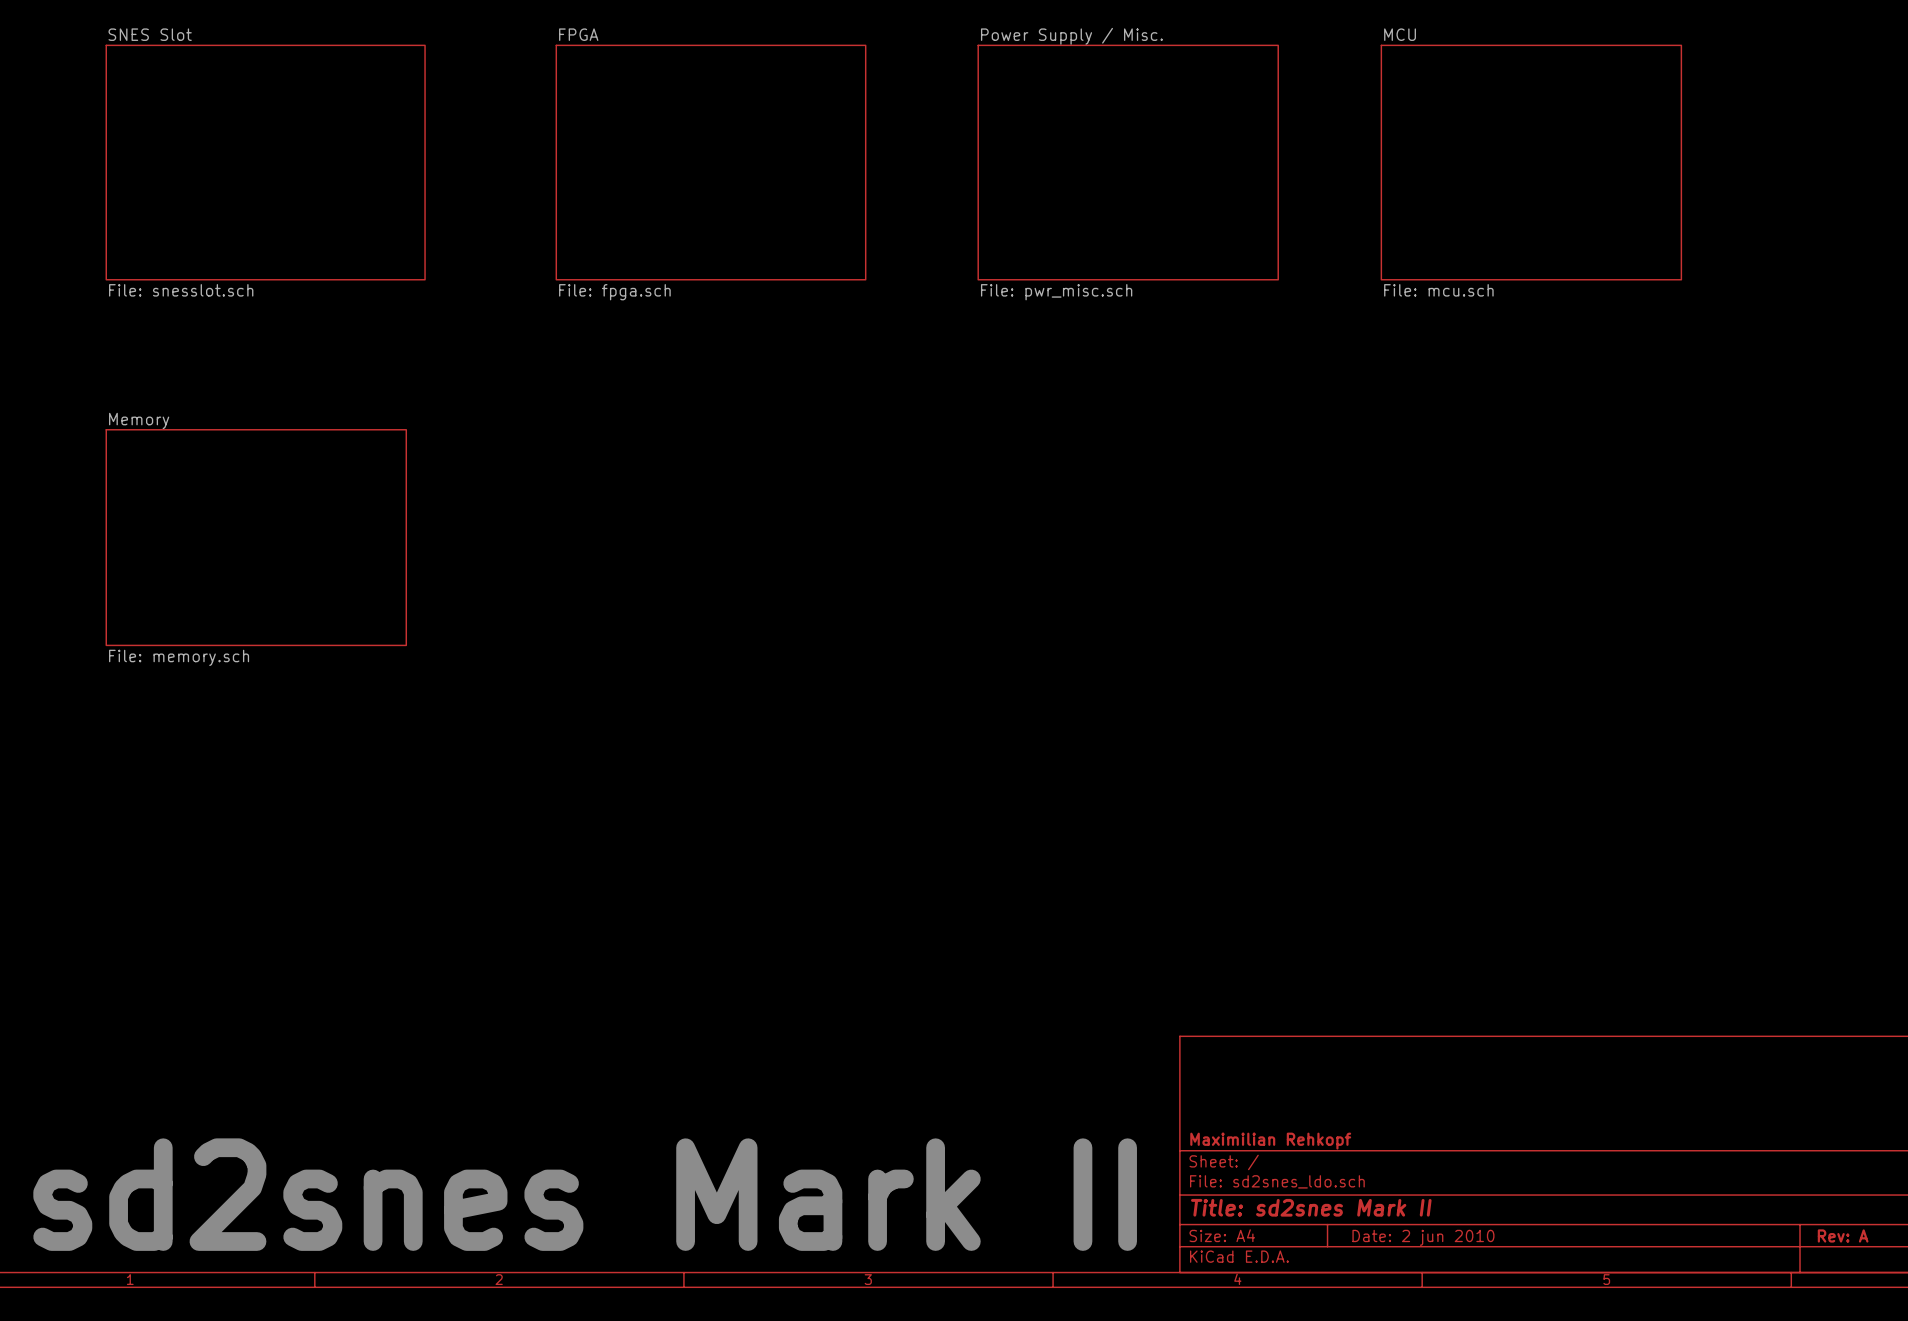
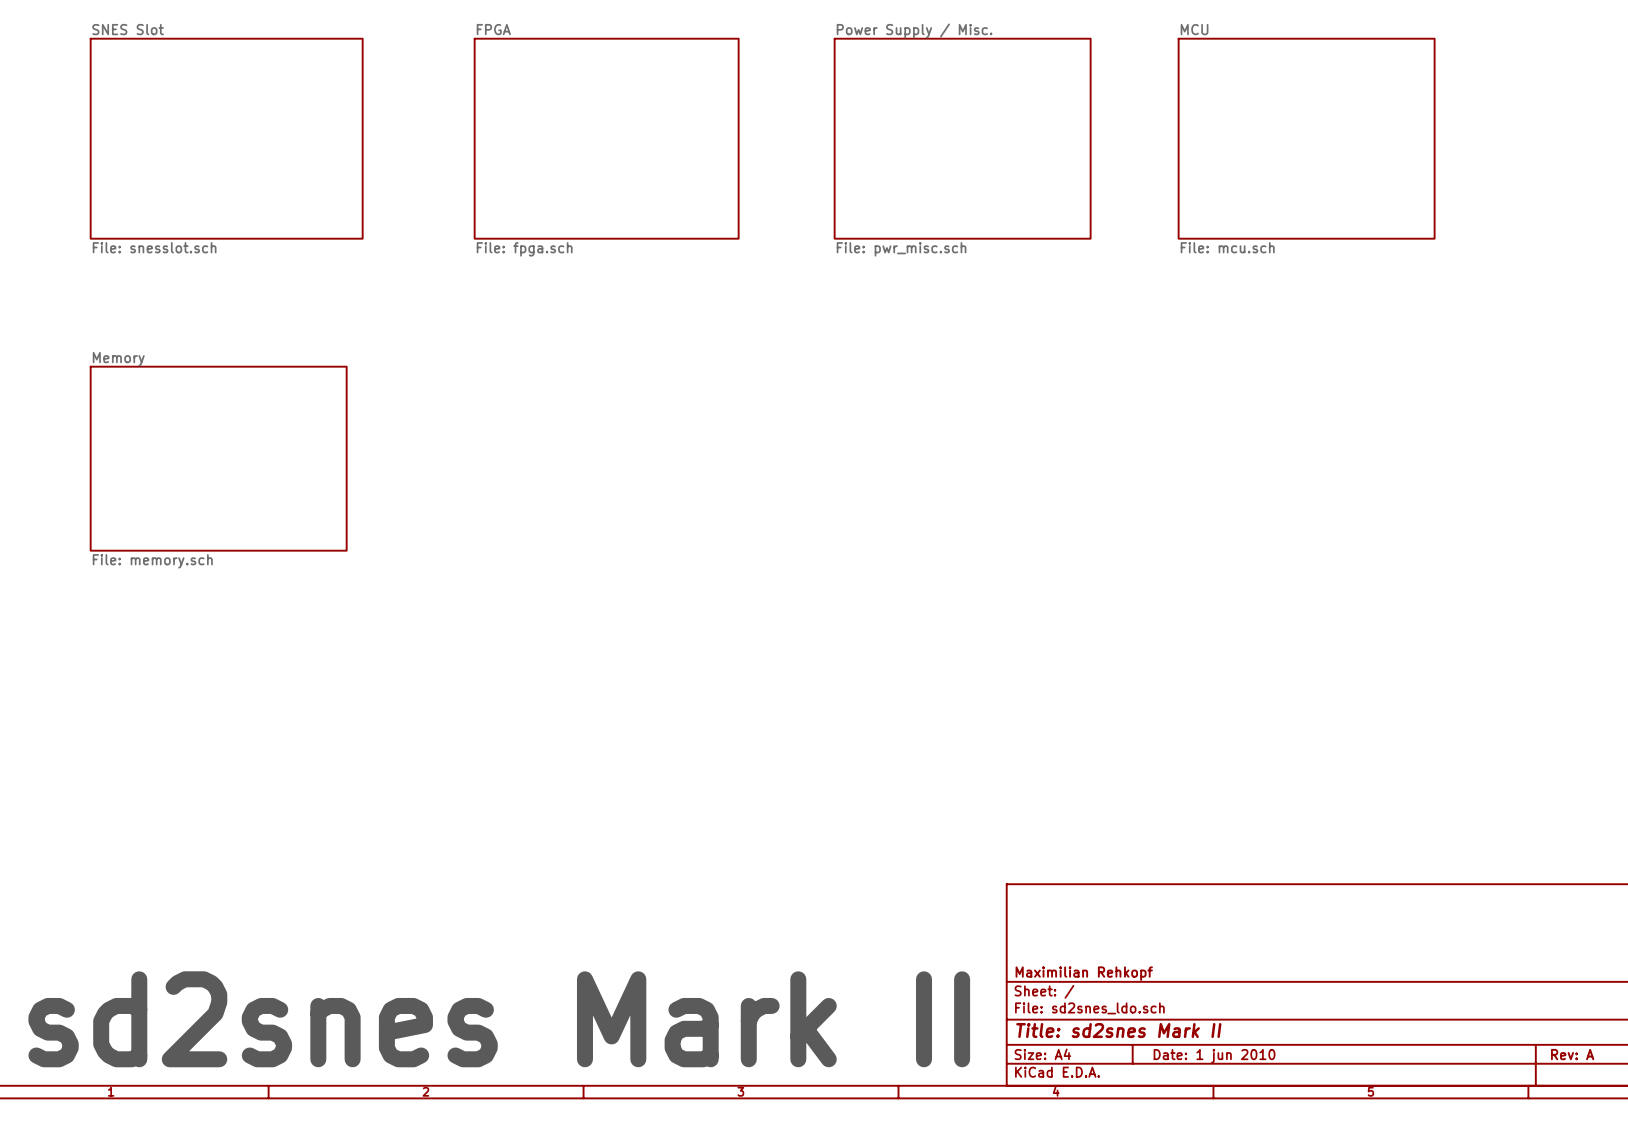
title block: Date: 2 jun 2010 (1423, 1237) -> Date: 1 jun 2010 (1214, 1056)

